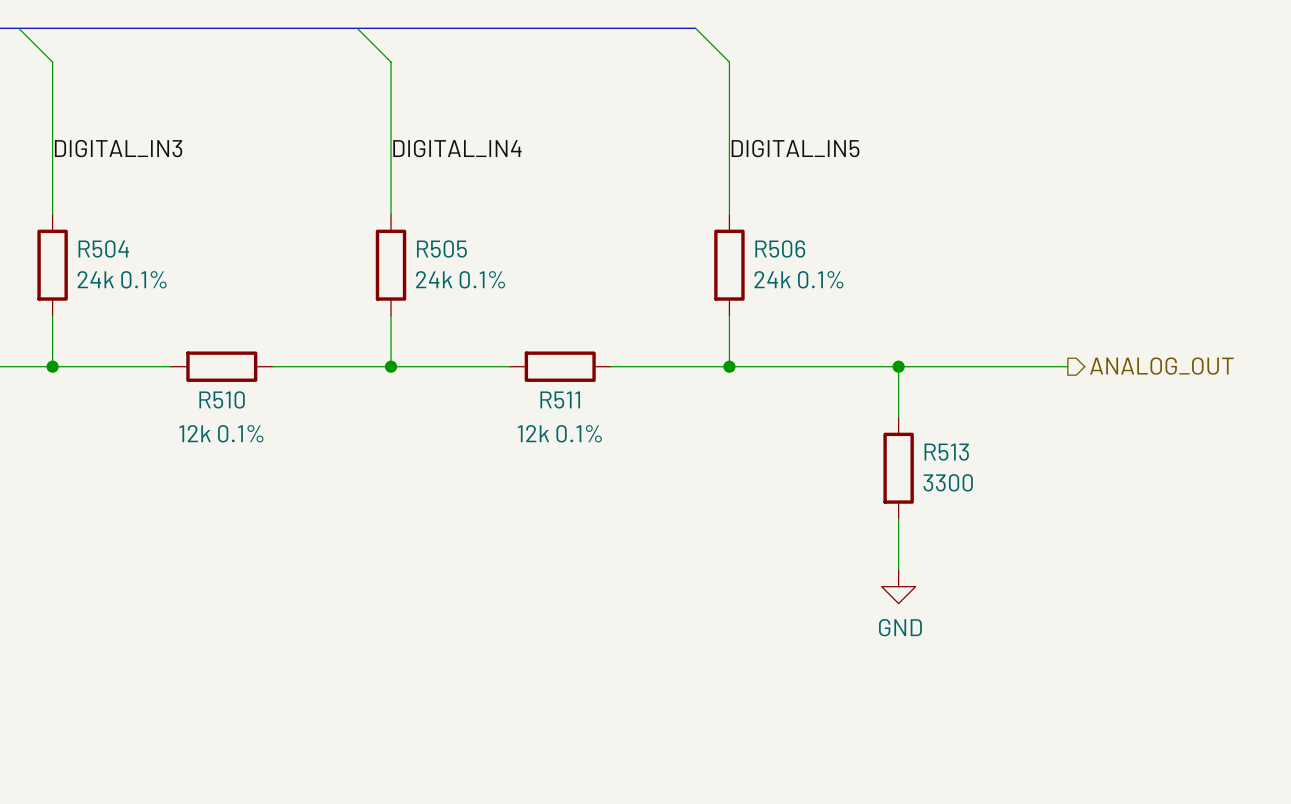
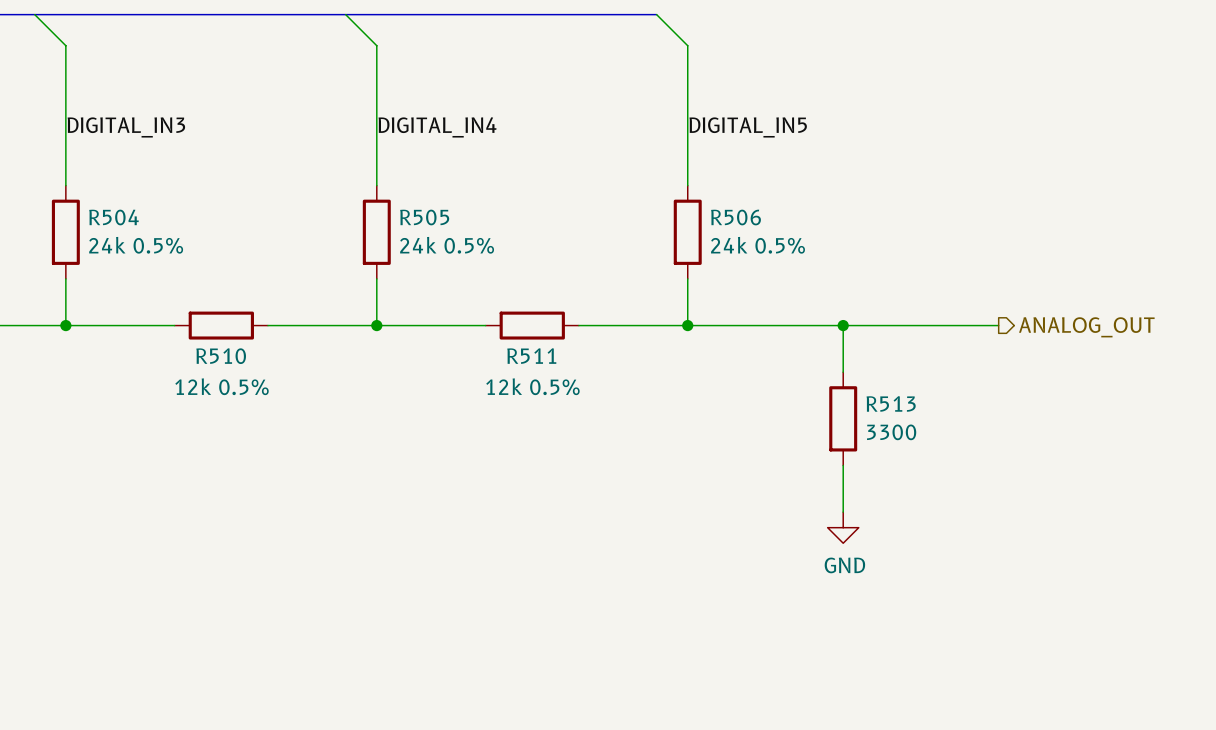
R504 value: 24k 0.1% (122, 279) -> 24k 0.5% (136, 245)
R505 value: 24k 0.1% (460, 279) -> 24k 0.5% (447, 245)
R506 value: 24k 0.1% (798, 279) -> 24k 0.5% (758, 245)
R510 value: 12k 0.1% (221, 433) -> 12k 0.5% (221, 386)
R511 value: 12k 0.1% (559, 433) -> 12k 0.5% (532, 386)

